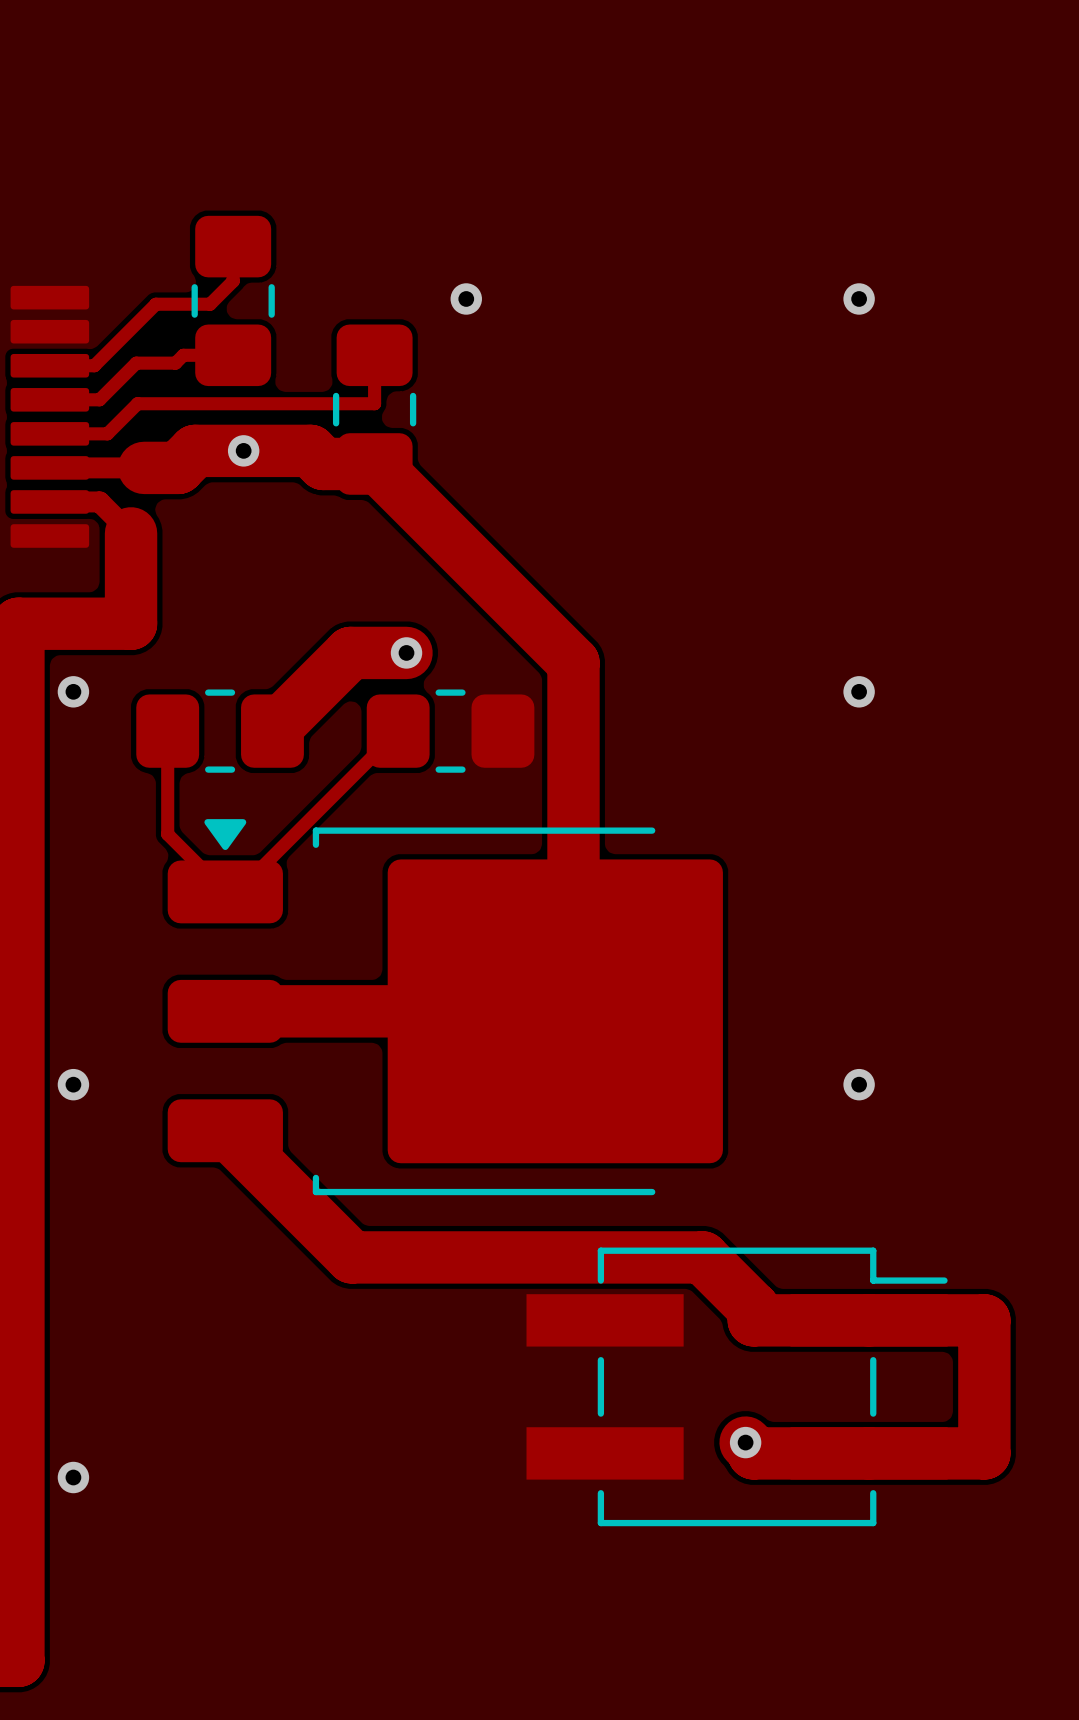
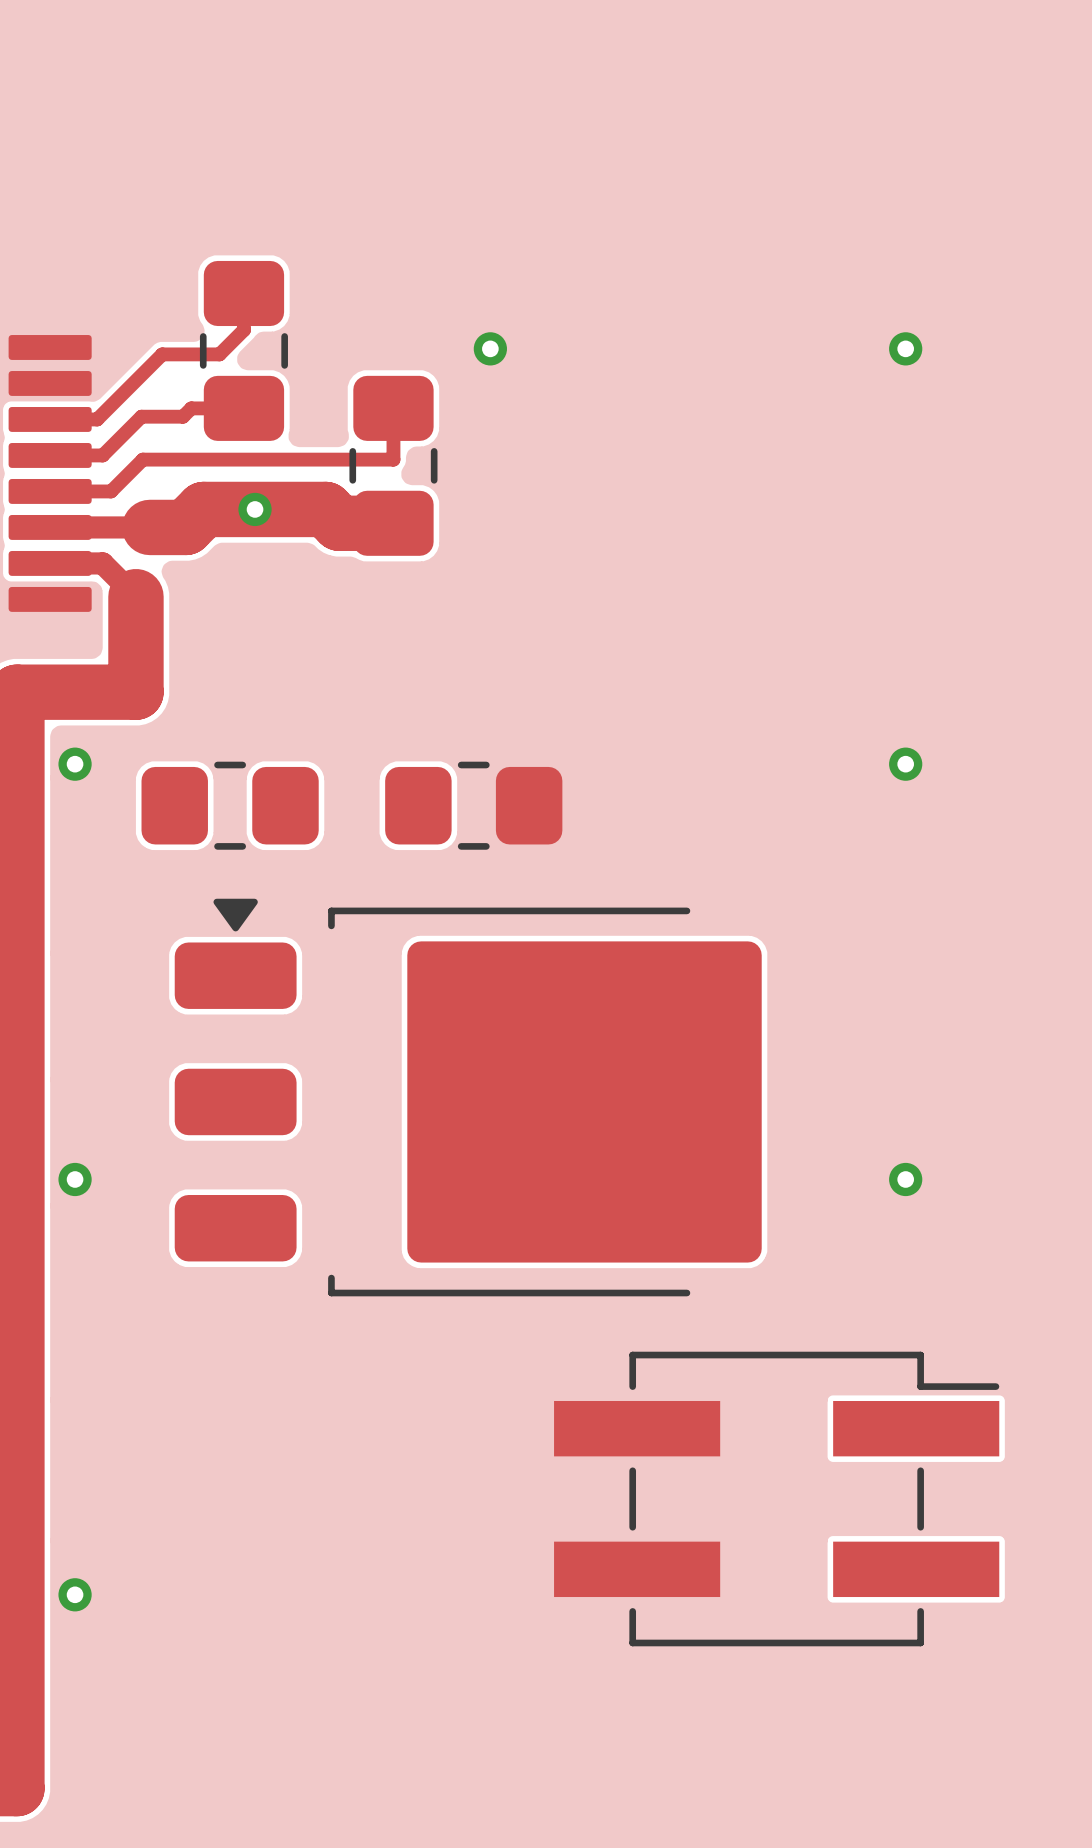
track: (374, 463) (573, 662) (573, 993) (555, 1011) (225, 1011) -> none
track: (406, 652) (350, 652) (272, 731) -> none
via: (406, 652) -> none
track: (167, 731) (167, 834) (225, 891) (237, 891) (398, 731) -> none
track: (225, 1130) (351, 1257) (702, 1257) (753, 1308) (753, 1320) (984, 1320) (984, 1453) (753, 1453) (753, 1450) (745, 1442) -> none
via: (745, 1442) -> none

